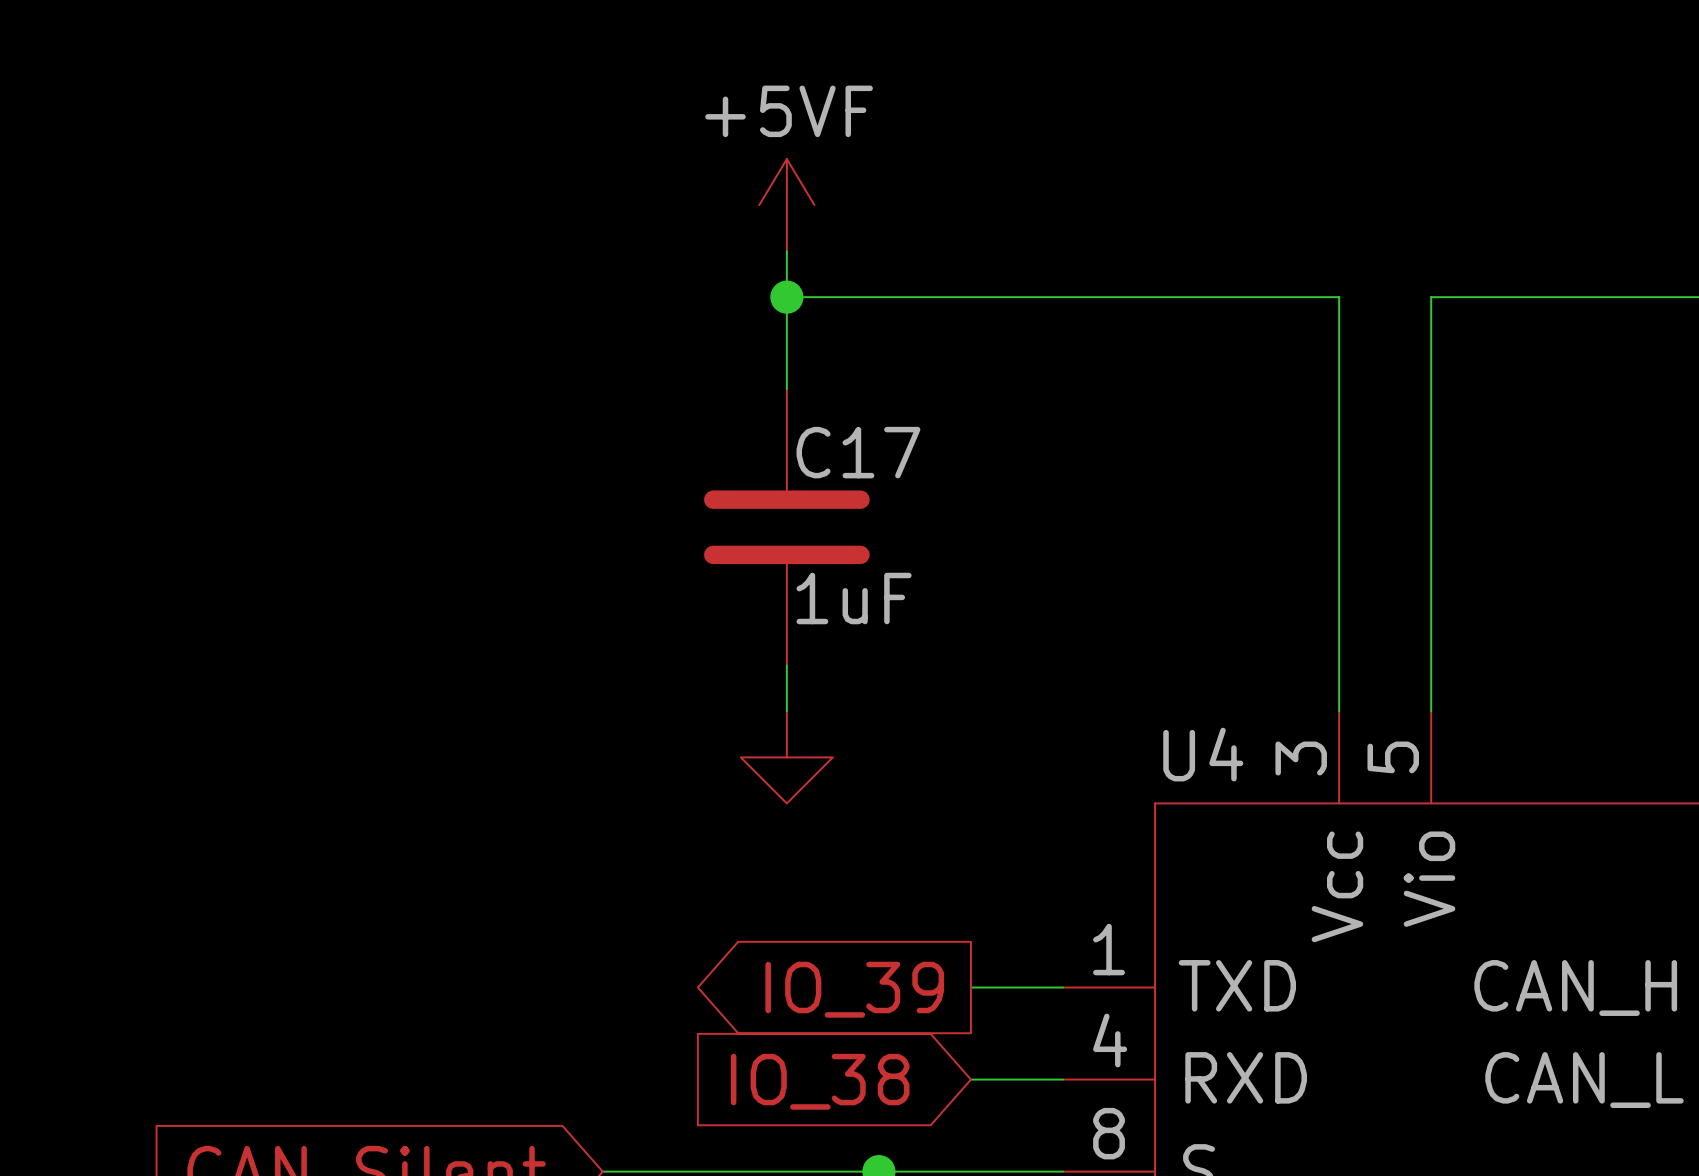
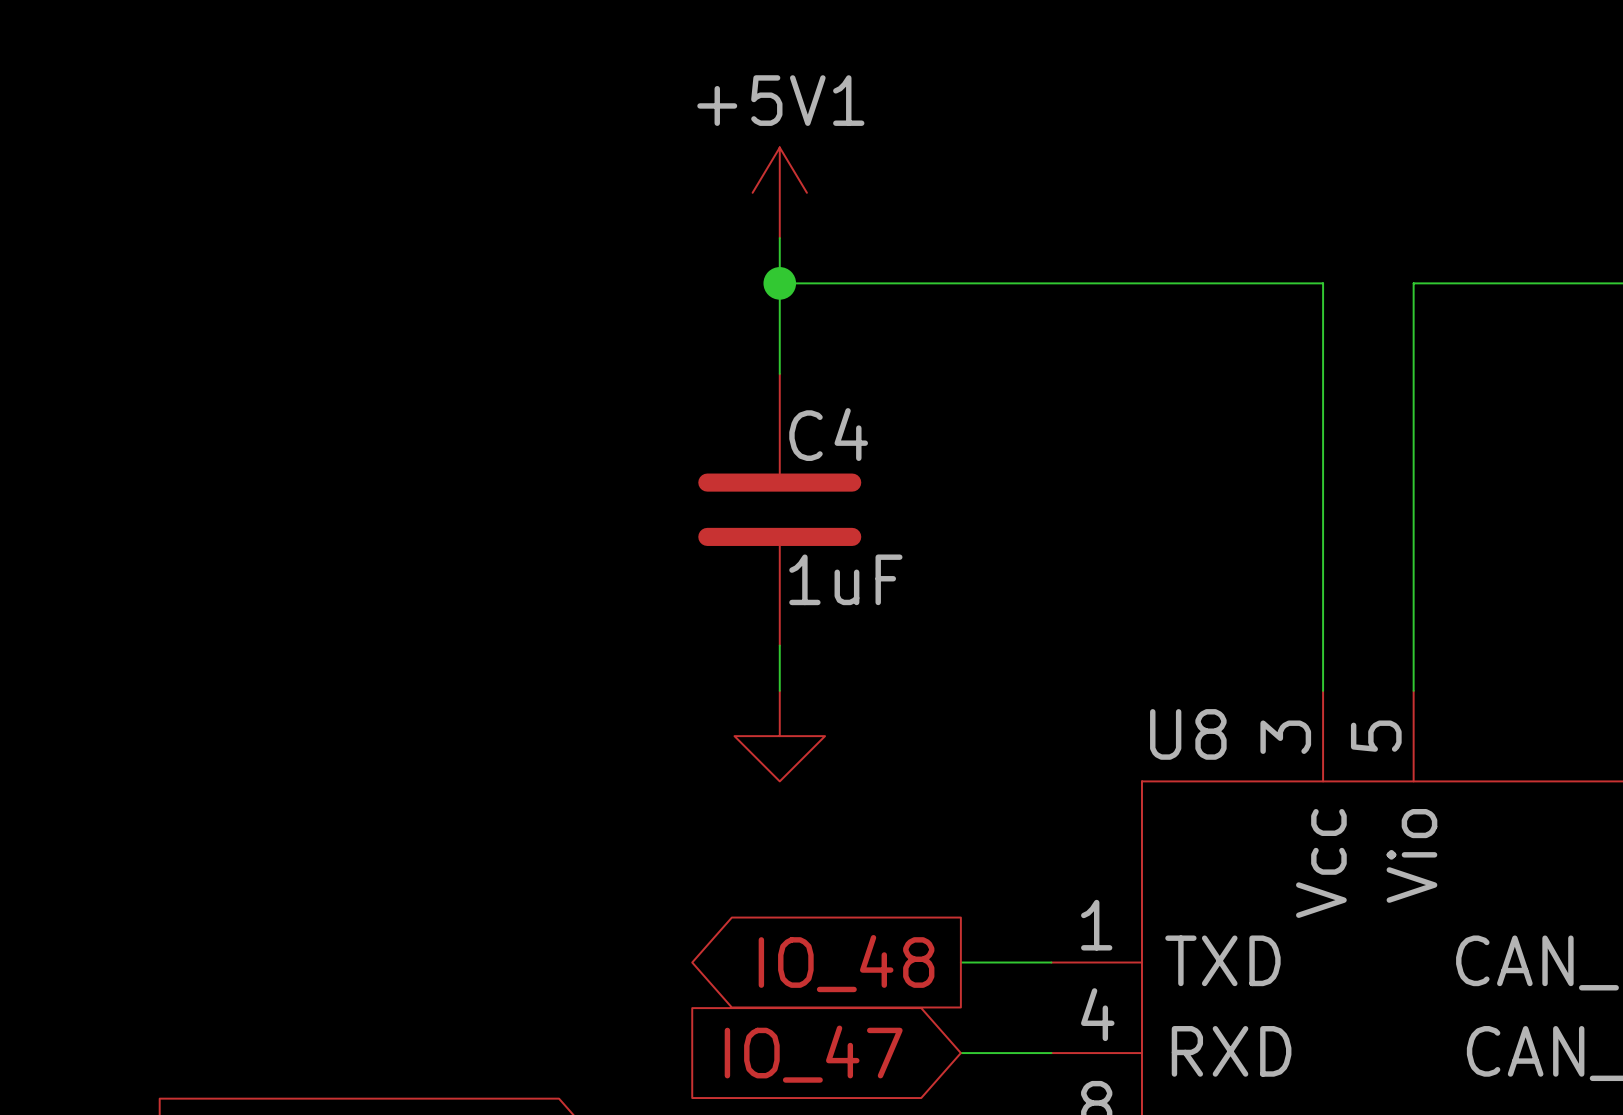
power symbol: +5VF (786, 205) -> +5V1 (779, 192)
C17 name: C17 (858, 452) -> C4 (828, 434)
U4 name: U4 (1203, 754) -> U8 (1188, 734)
global label: IO_39 (854, 989) -> IO_48 (846, 963)
global label: IO_38 (820, 1081) -> IO_47 (813, 1054)

